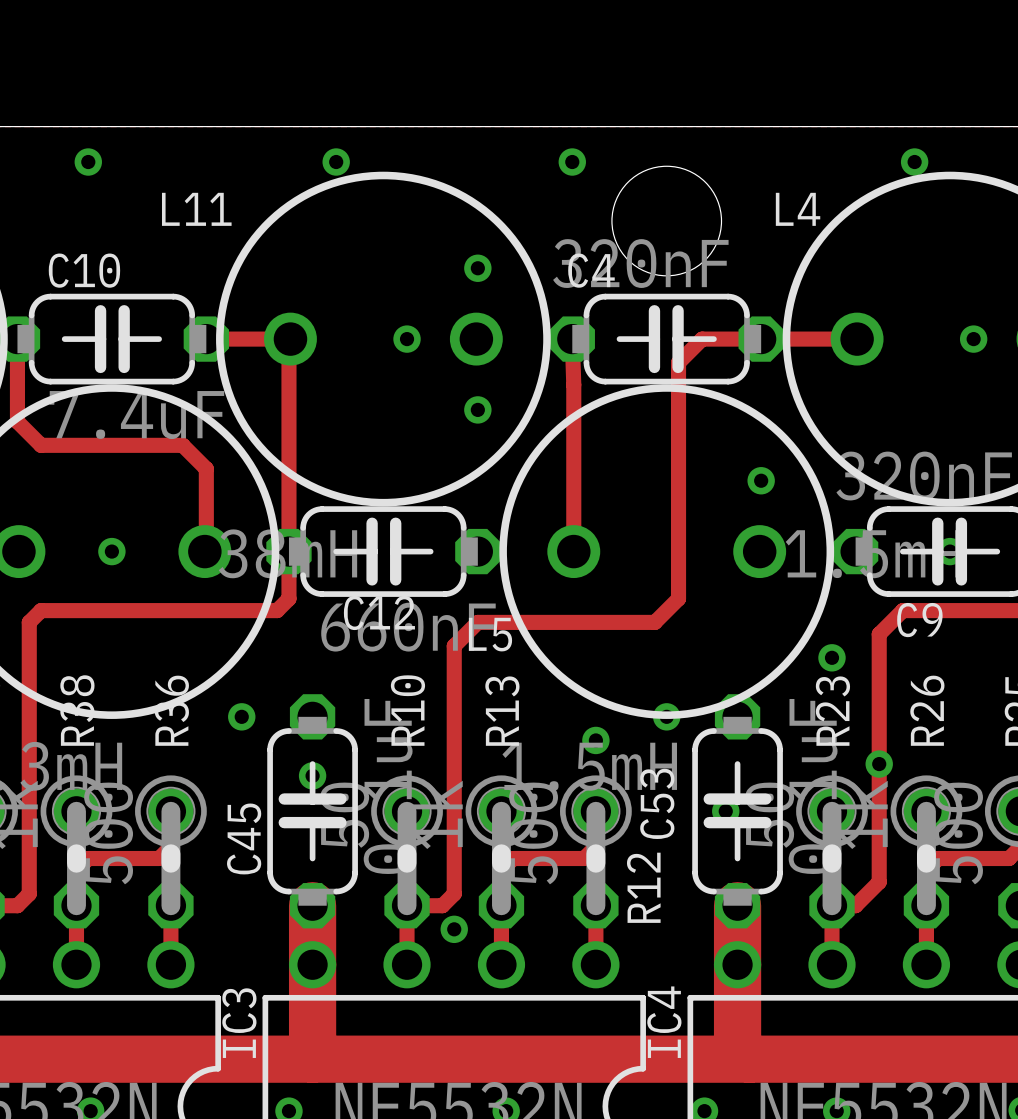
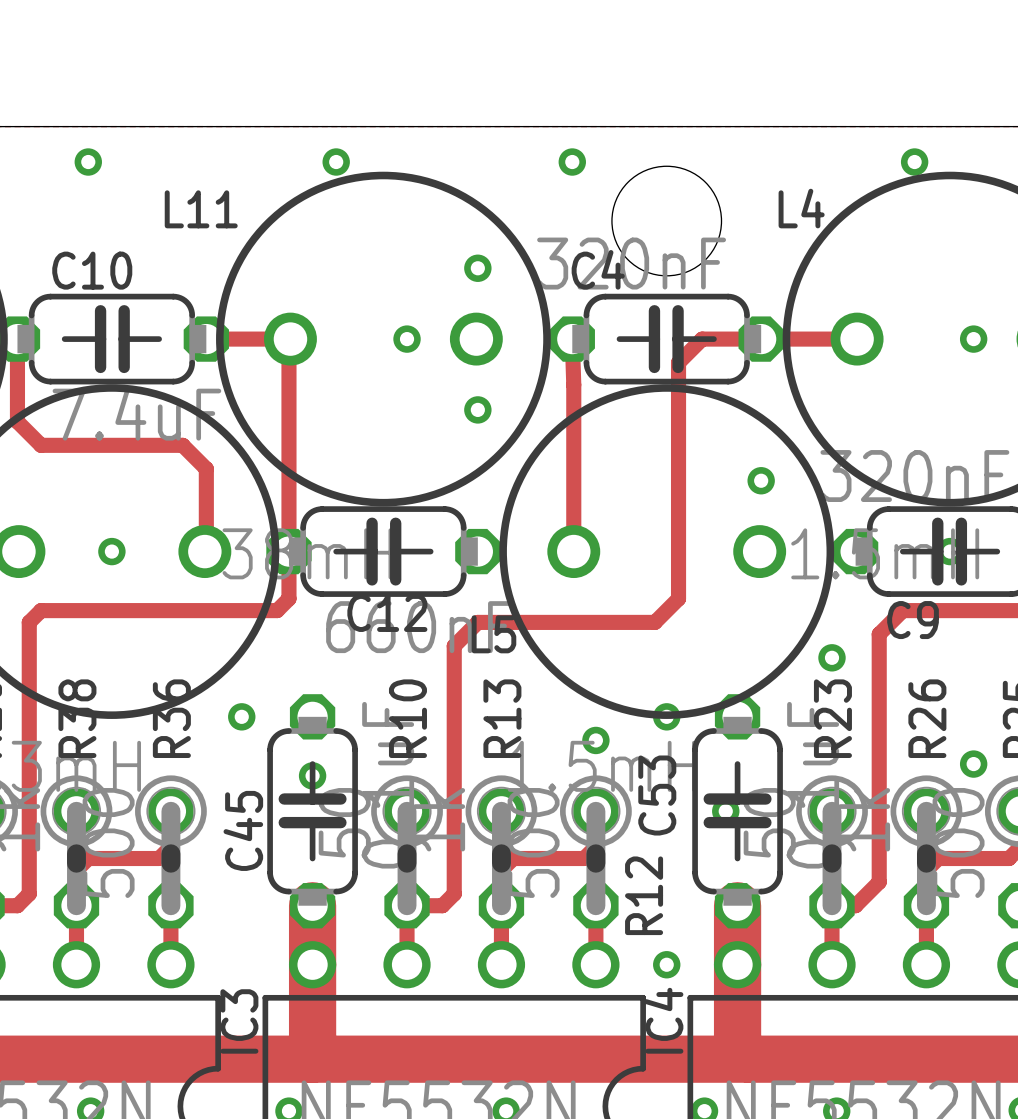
via position: (879, 764) -> (973, 764)
via: (454, 929) -> none
via: none -> (666, 964)

